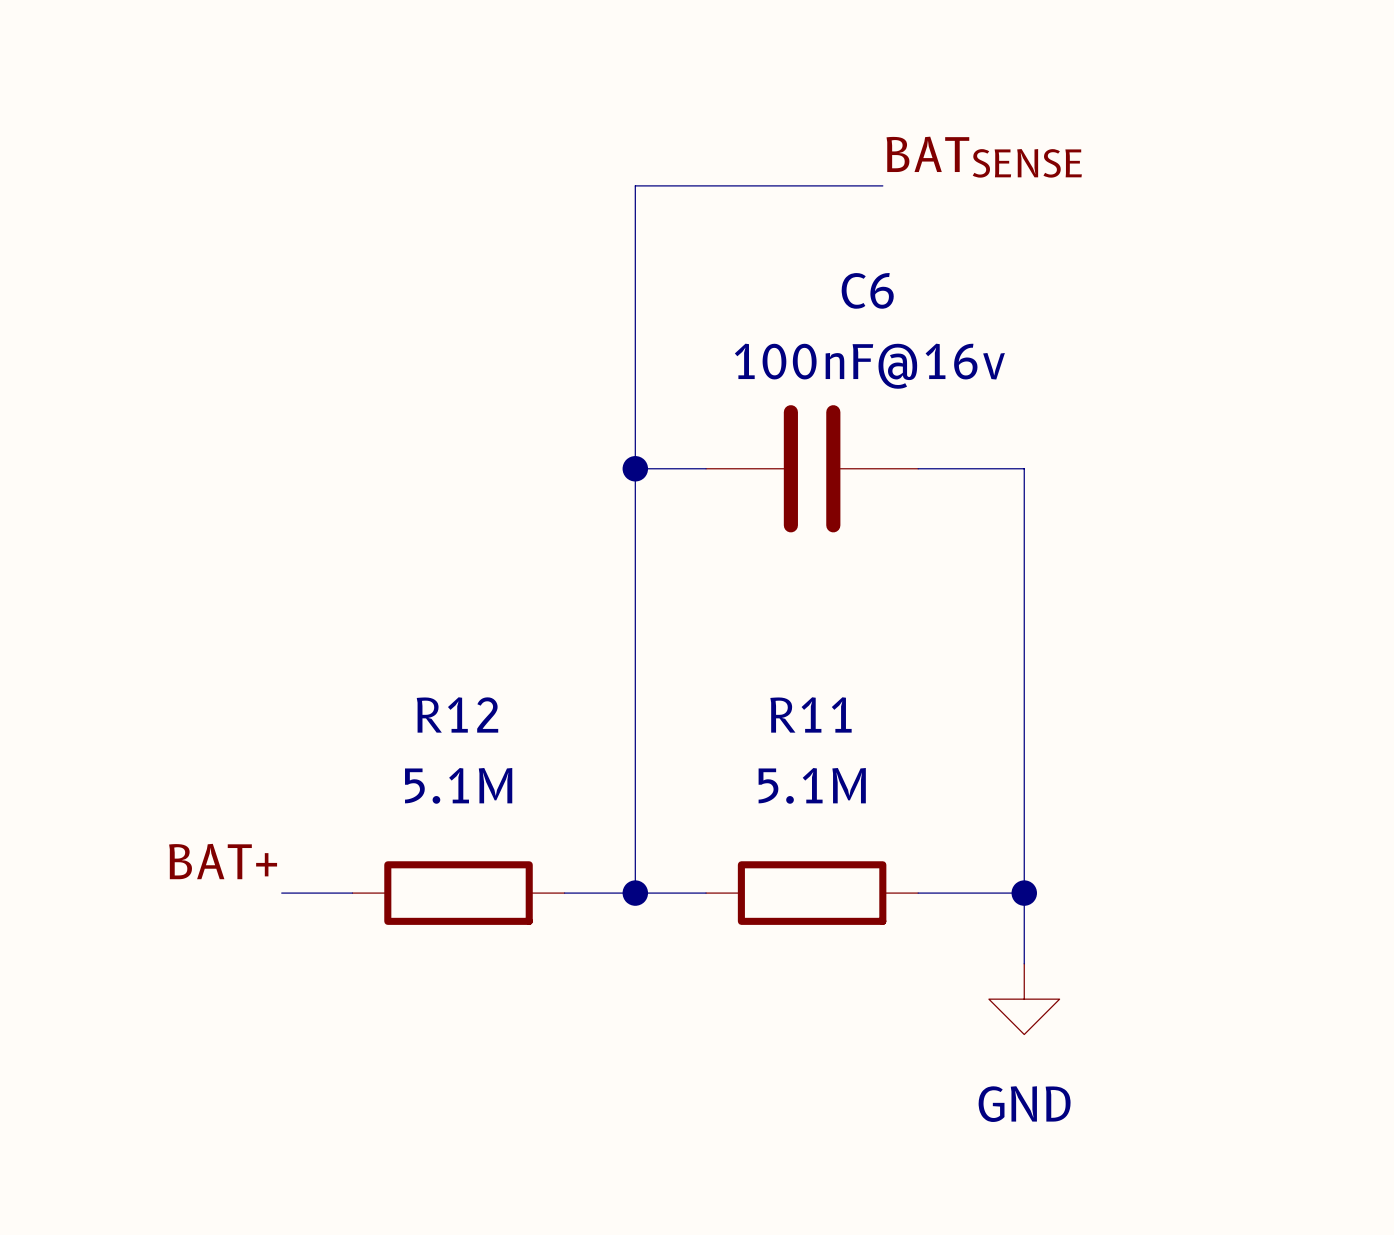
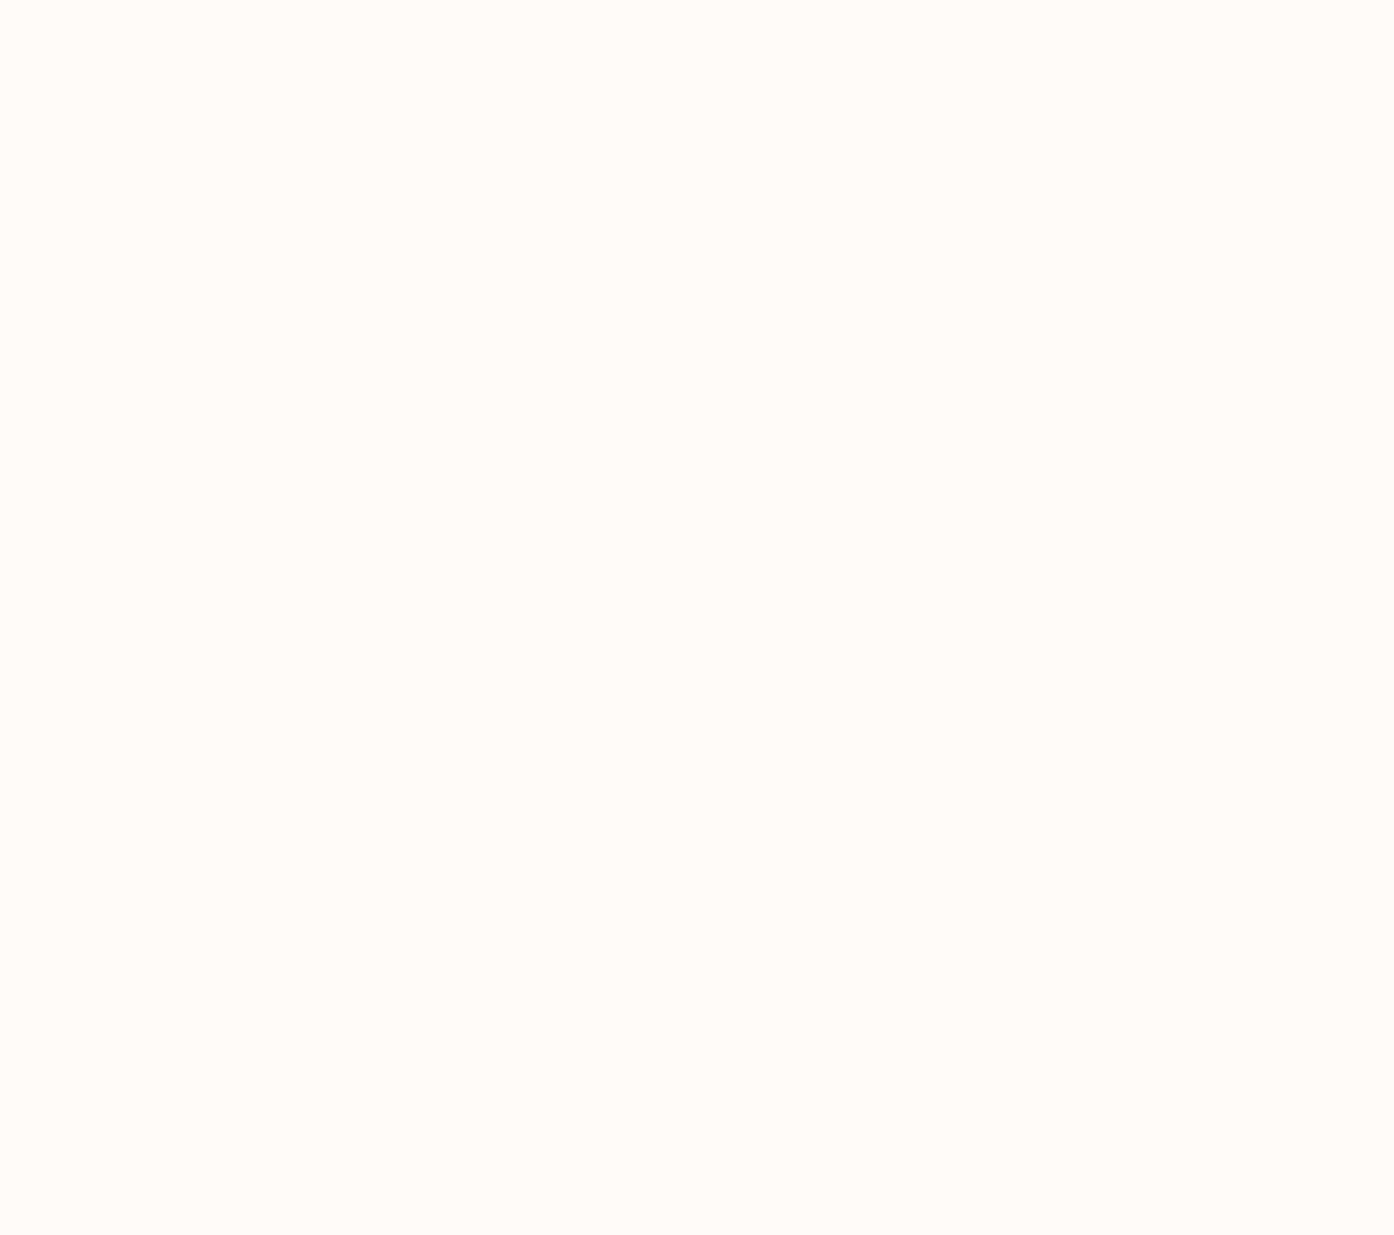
label: BATSENSE (984, 157) -> none
wire: (882, 185) (635, 185) (635, 893) -> none
wire: (635, 468) (706, 468) -> none
junction: (635, 468) -> none
C6: 100nF@16v (812, 468) -> none
wire: (918, 468) (1024, 468) (1024, 963) -> none
label: BAT+ (223, 861) -> none
wire: (281, 893) (352, 893) -> none
R12: 5.1M (458, 893) -> none
wire: (564, 893) (706, 893) -> none
junction: (635, 893) -> none
R11: 5.1M (812, 893) -> none
wire: (918, 893) (1024, 893) -> none
junction: (1024, 893) -> none
power symbol: GND (1024, 999) -> none

